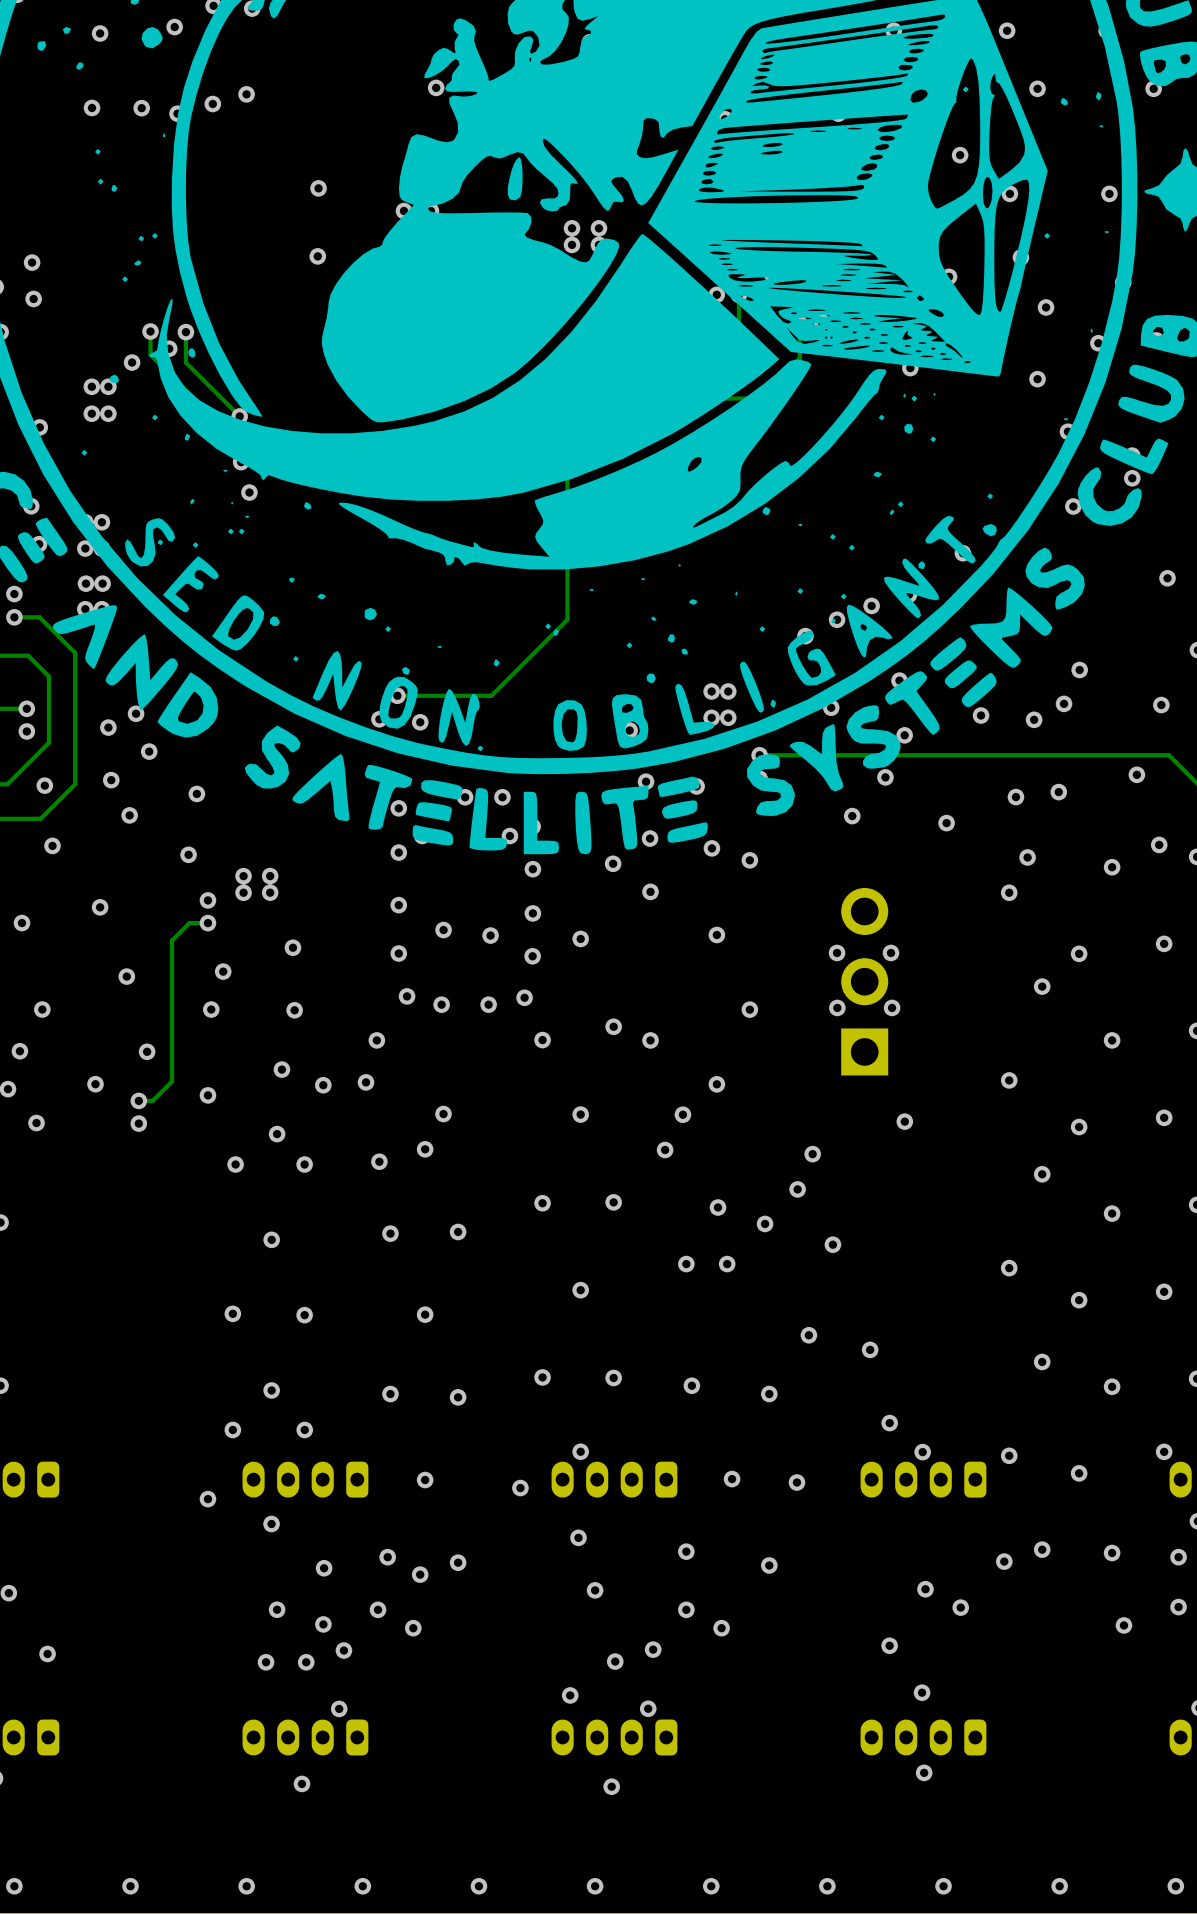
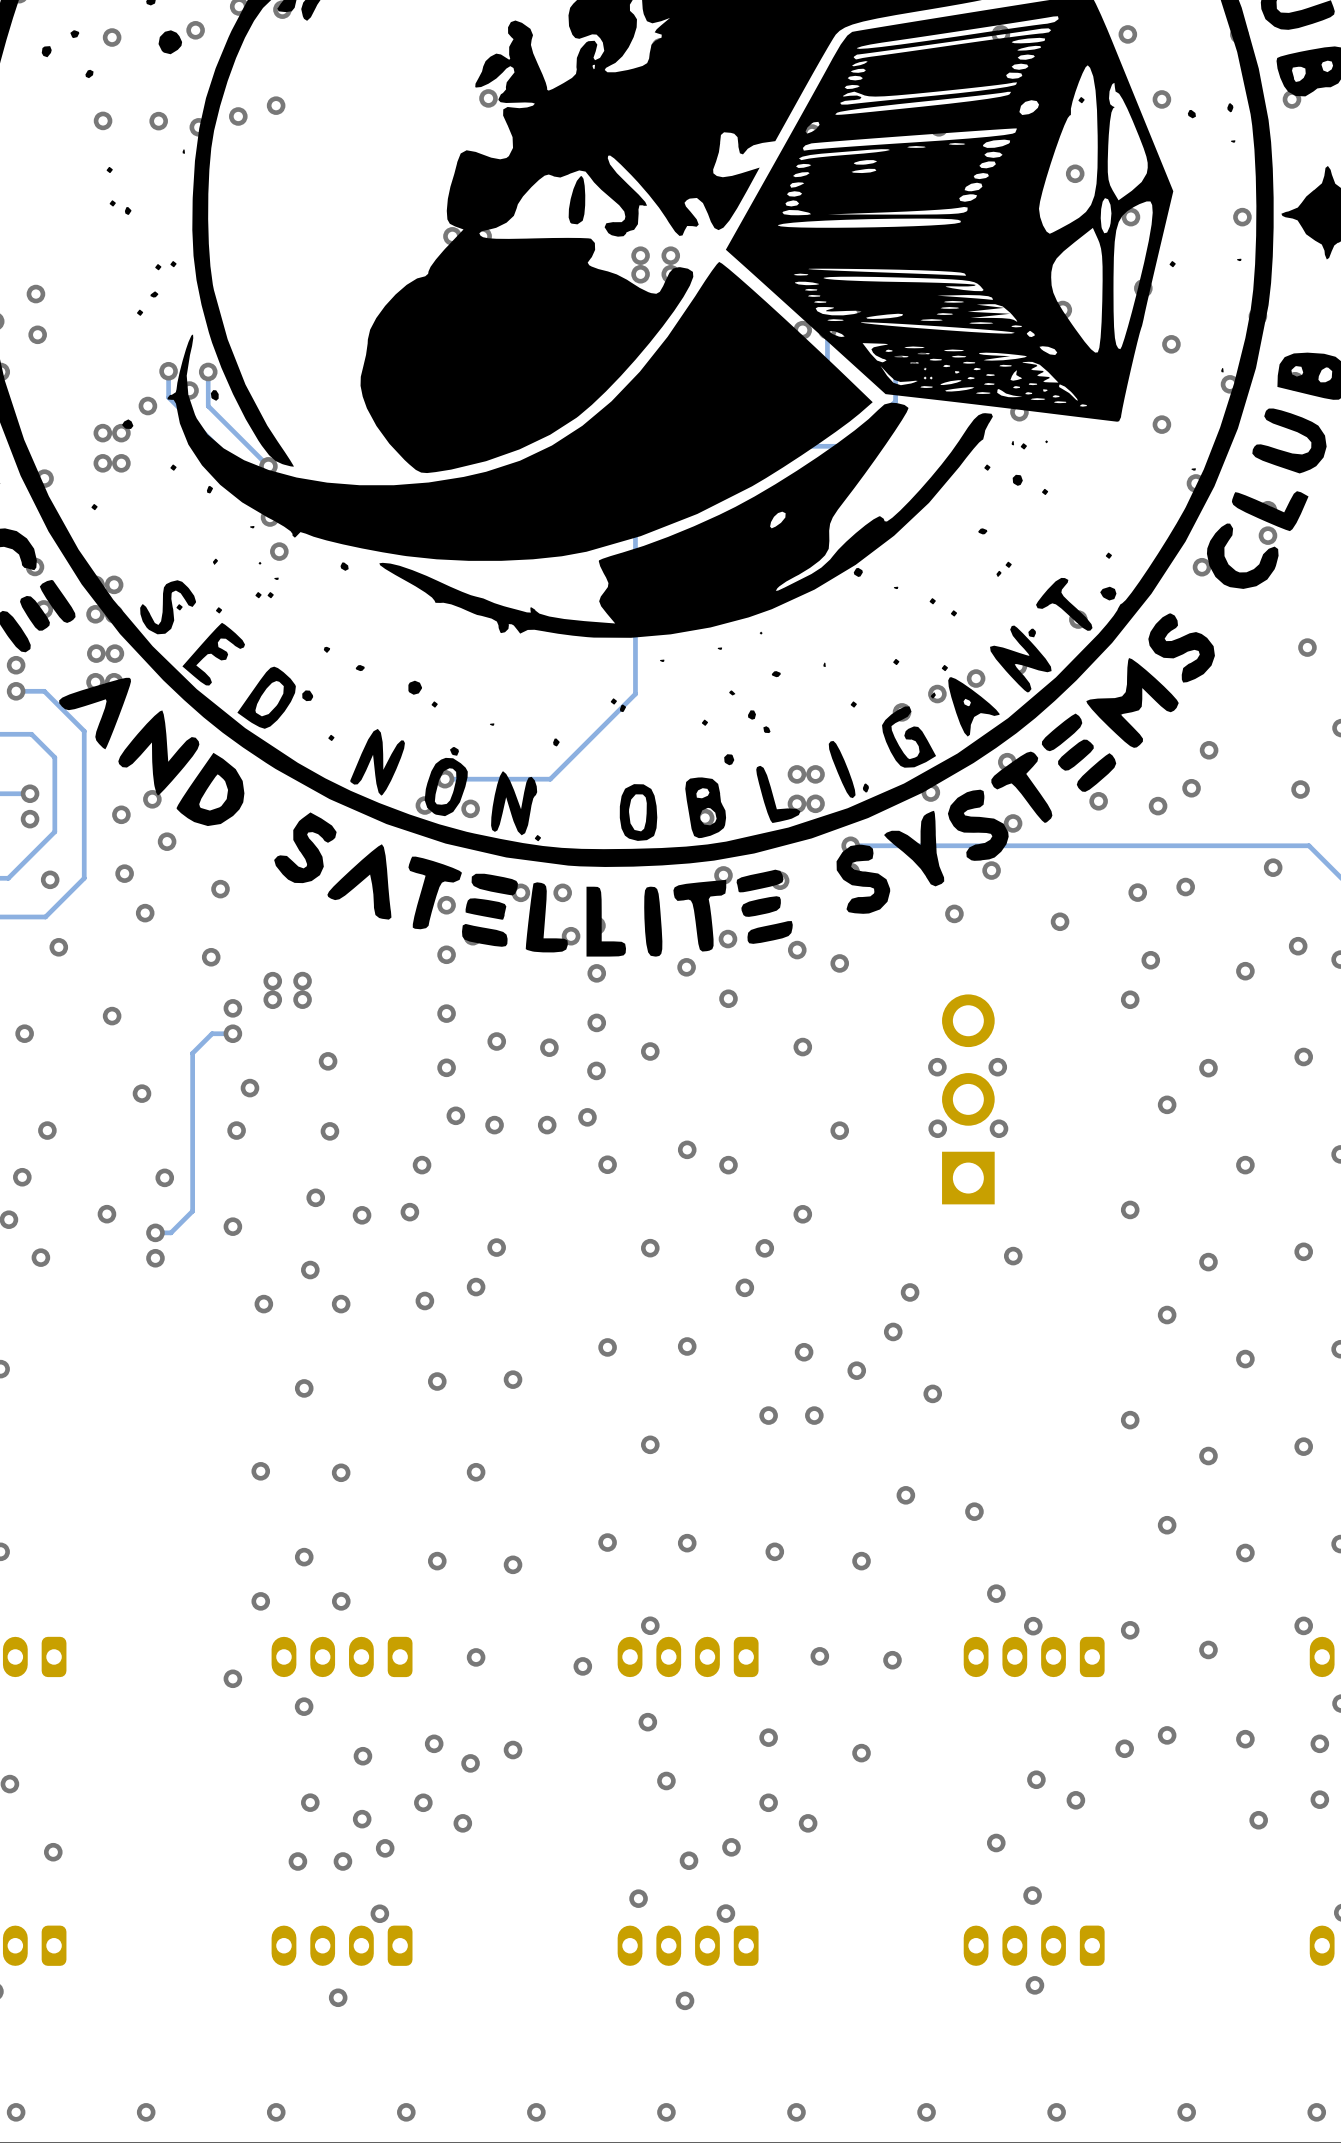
via: (318, 188) -> none
via: (317, 256) -> none

